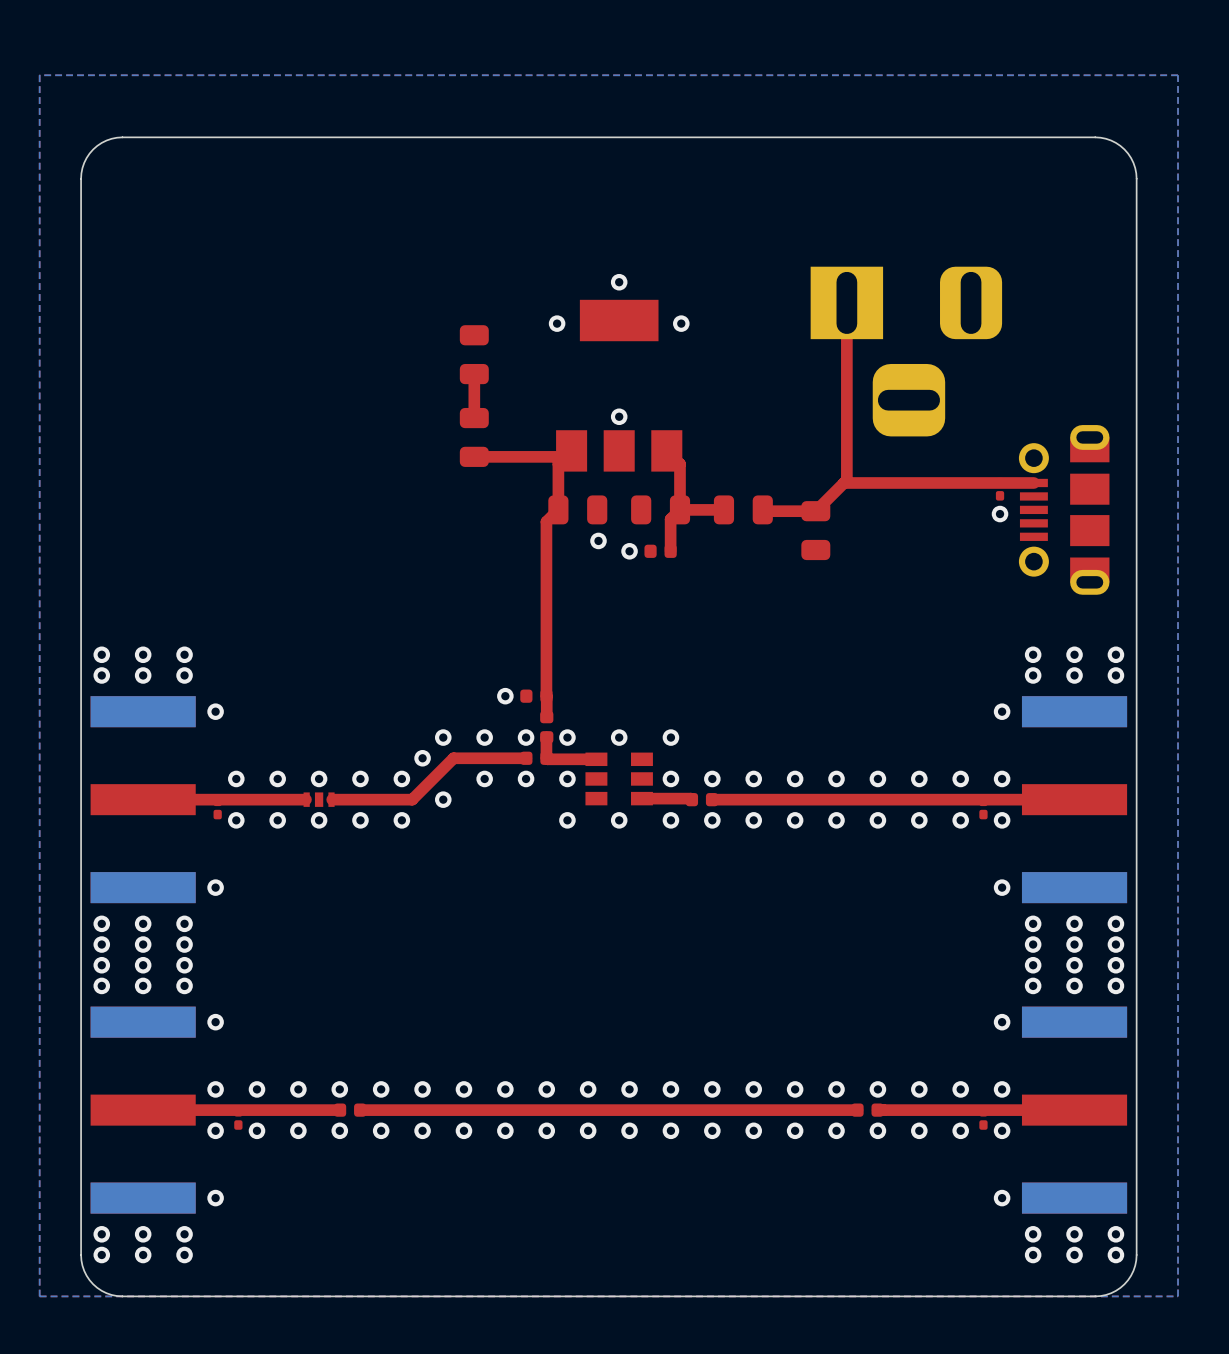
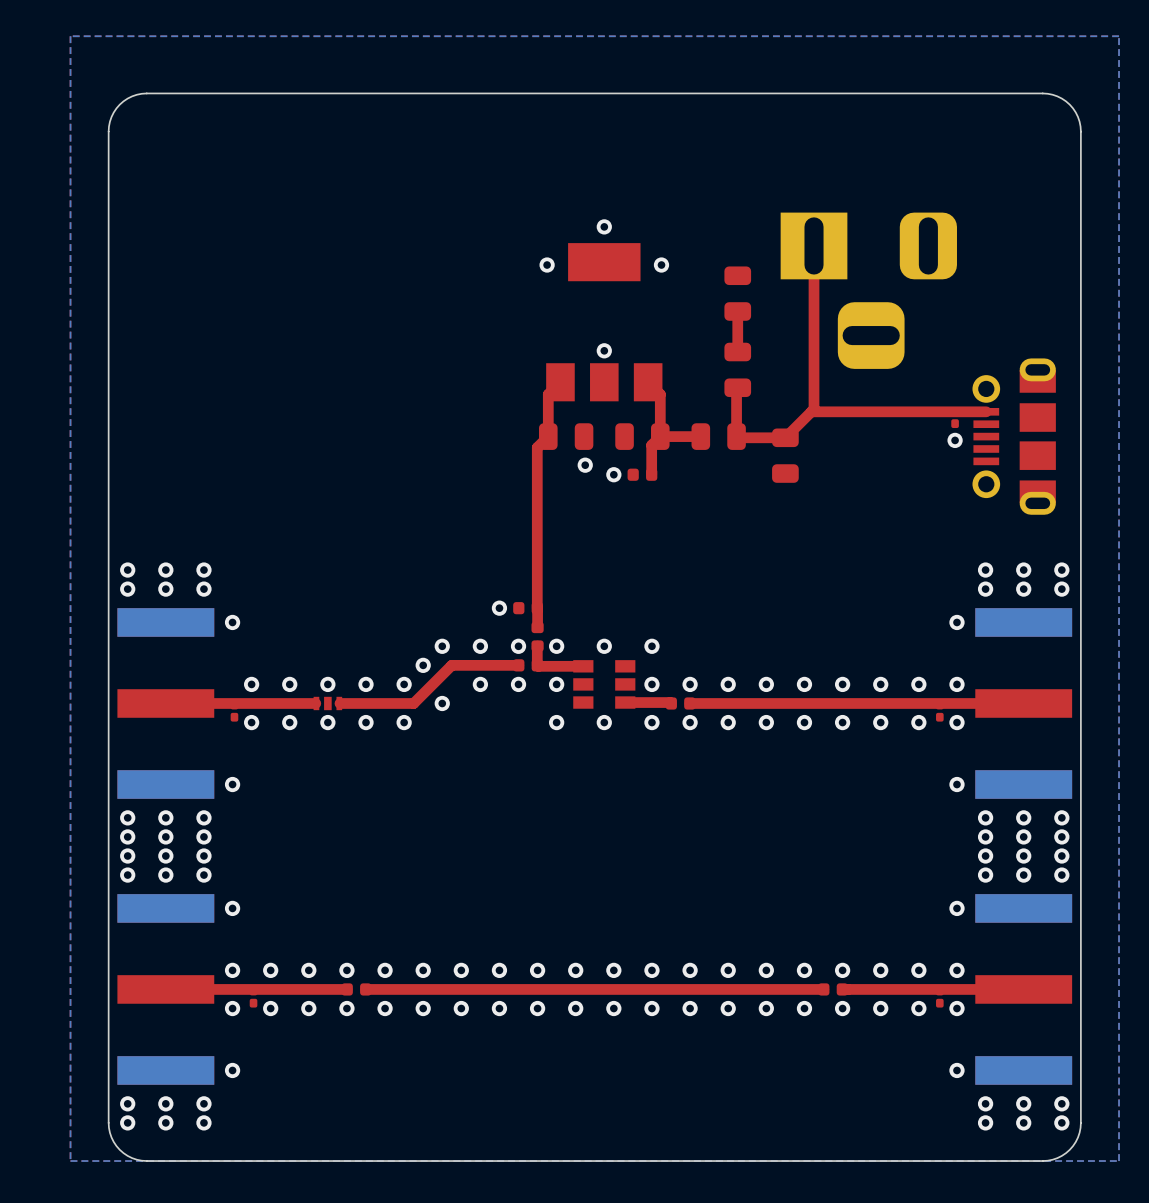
part: (474, 354) -> none
part: none -> (737, 293)
top track: (474, 374) (474, 418) -> (737, 311) (737, 352)
part: (474, 437) -> none
part: none -> (737, 369)
top track: (565, 456) (473, 458) -> none
top track: none -> (737, 387) (736, 436)

